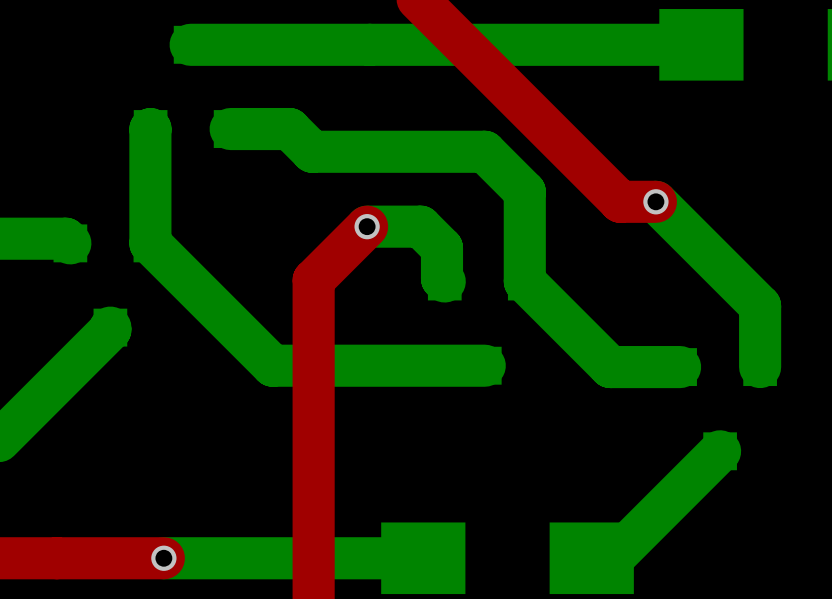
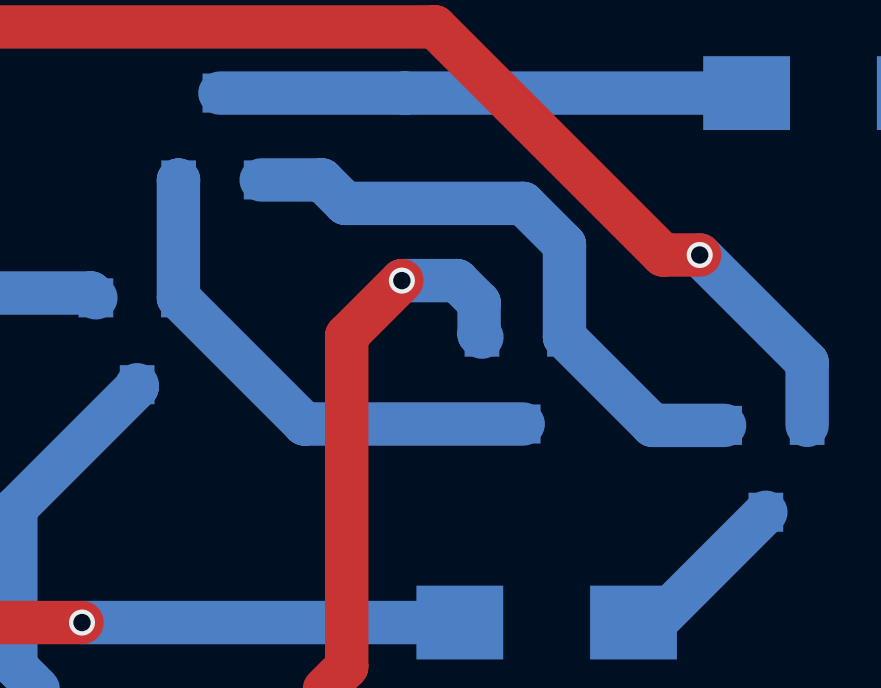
top track: (56, 558) (163, 558) -> none
bottom track: none -> (82, 622) (192, 622)
via position: (163, 558) -> (82, 622)

